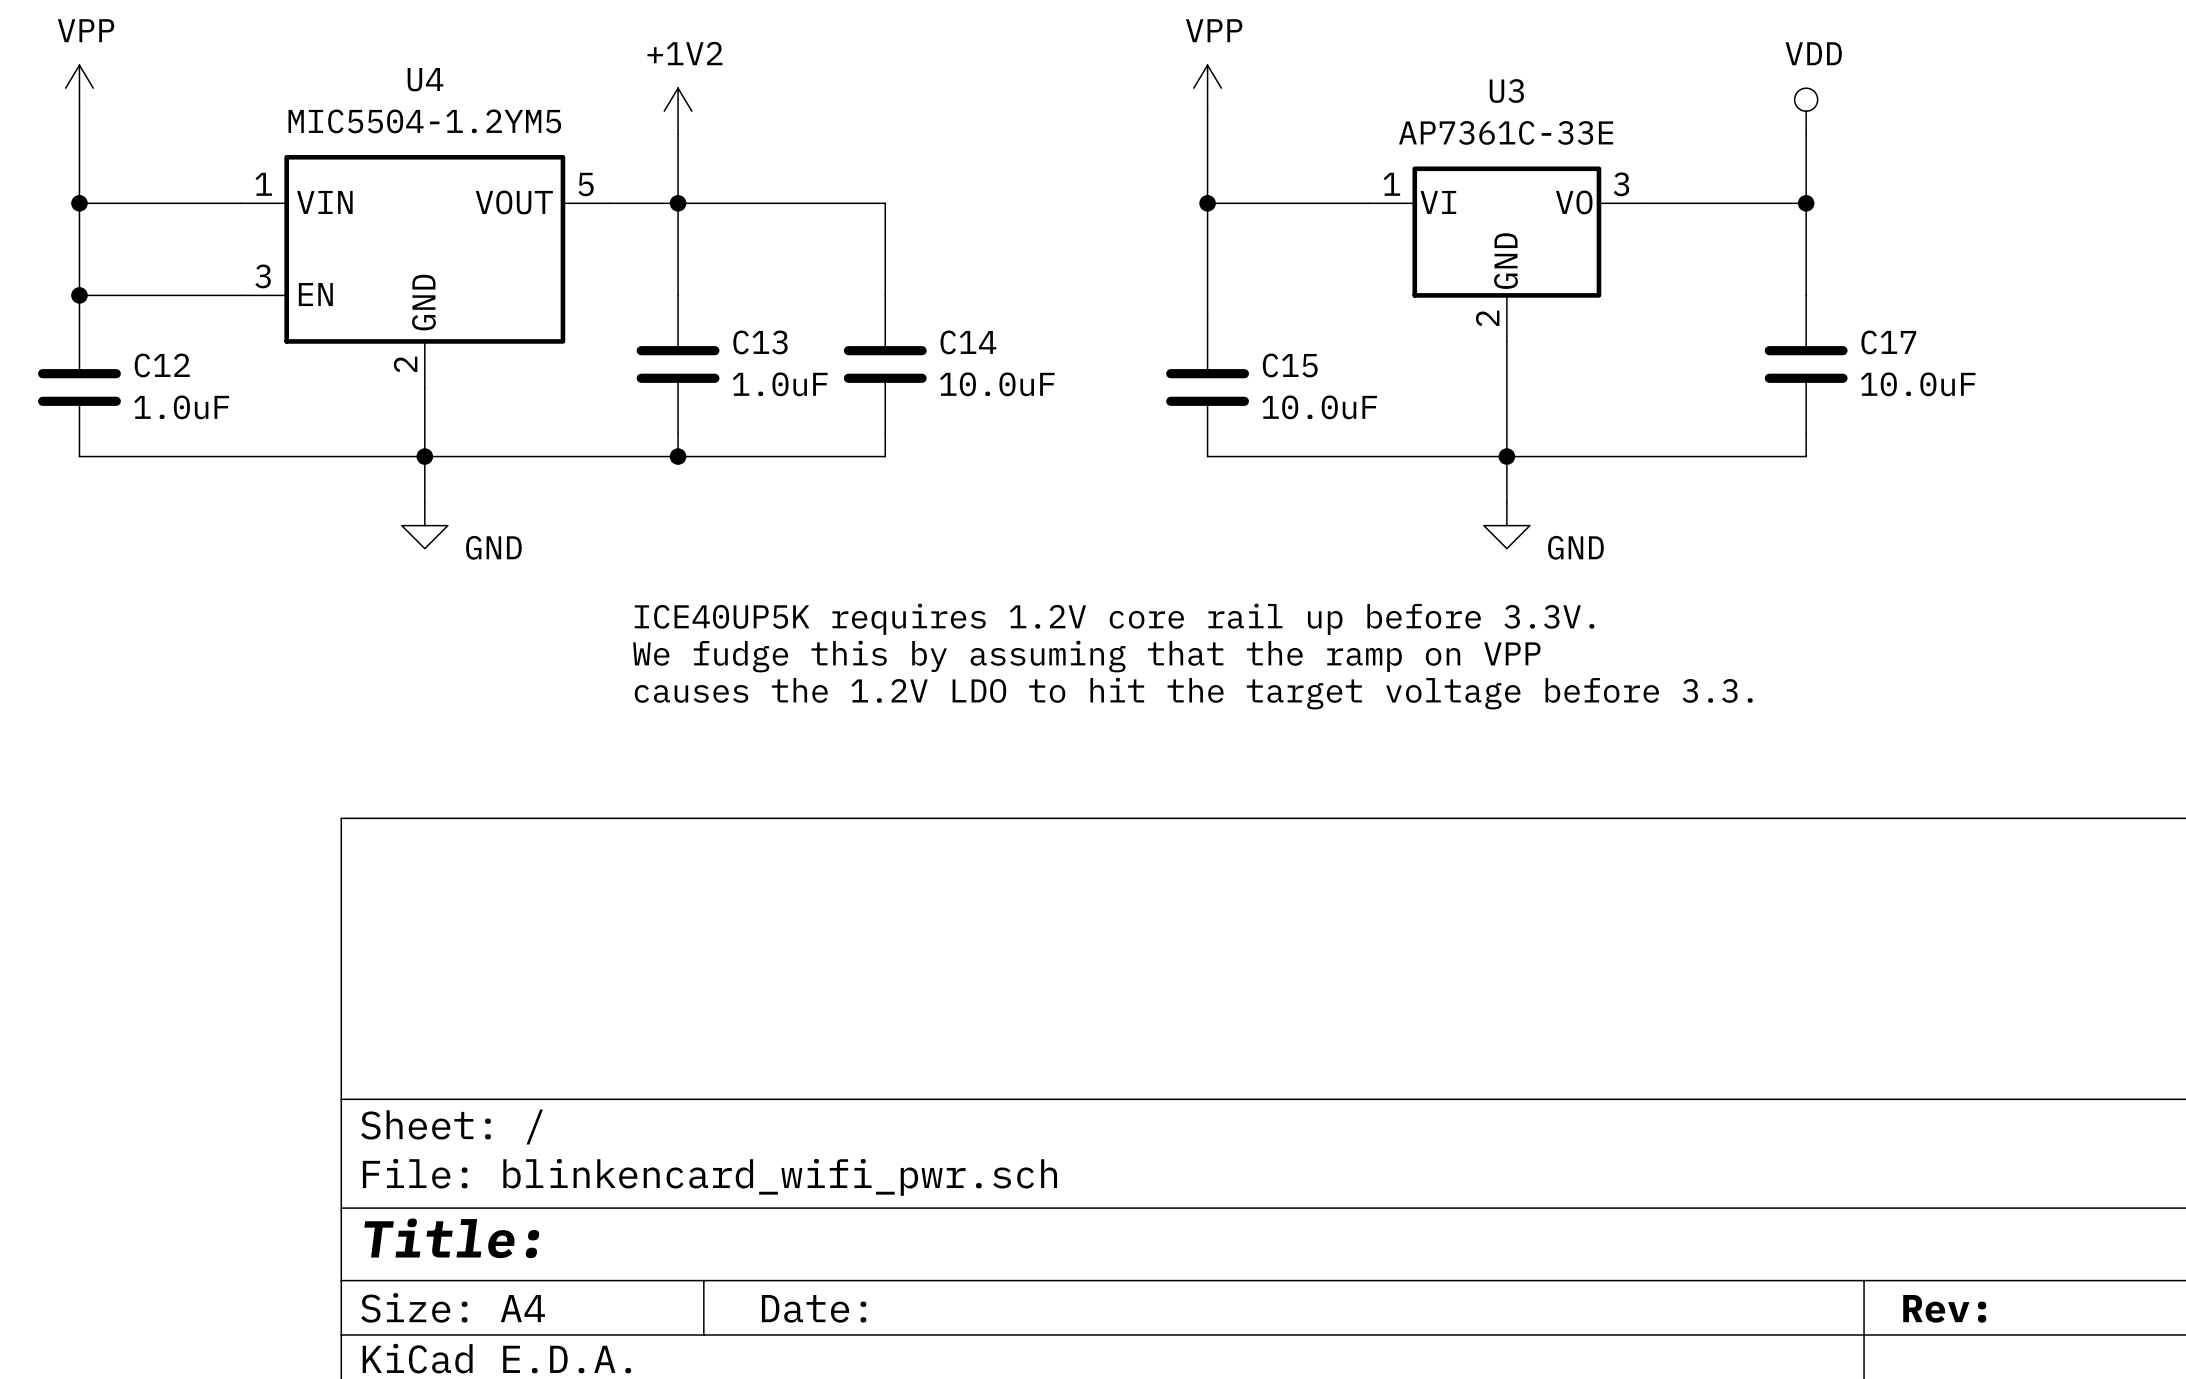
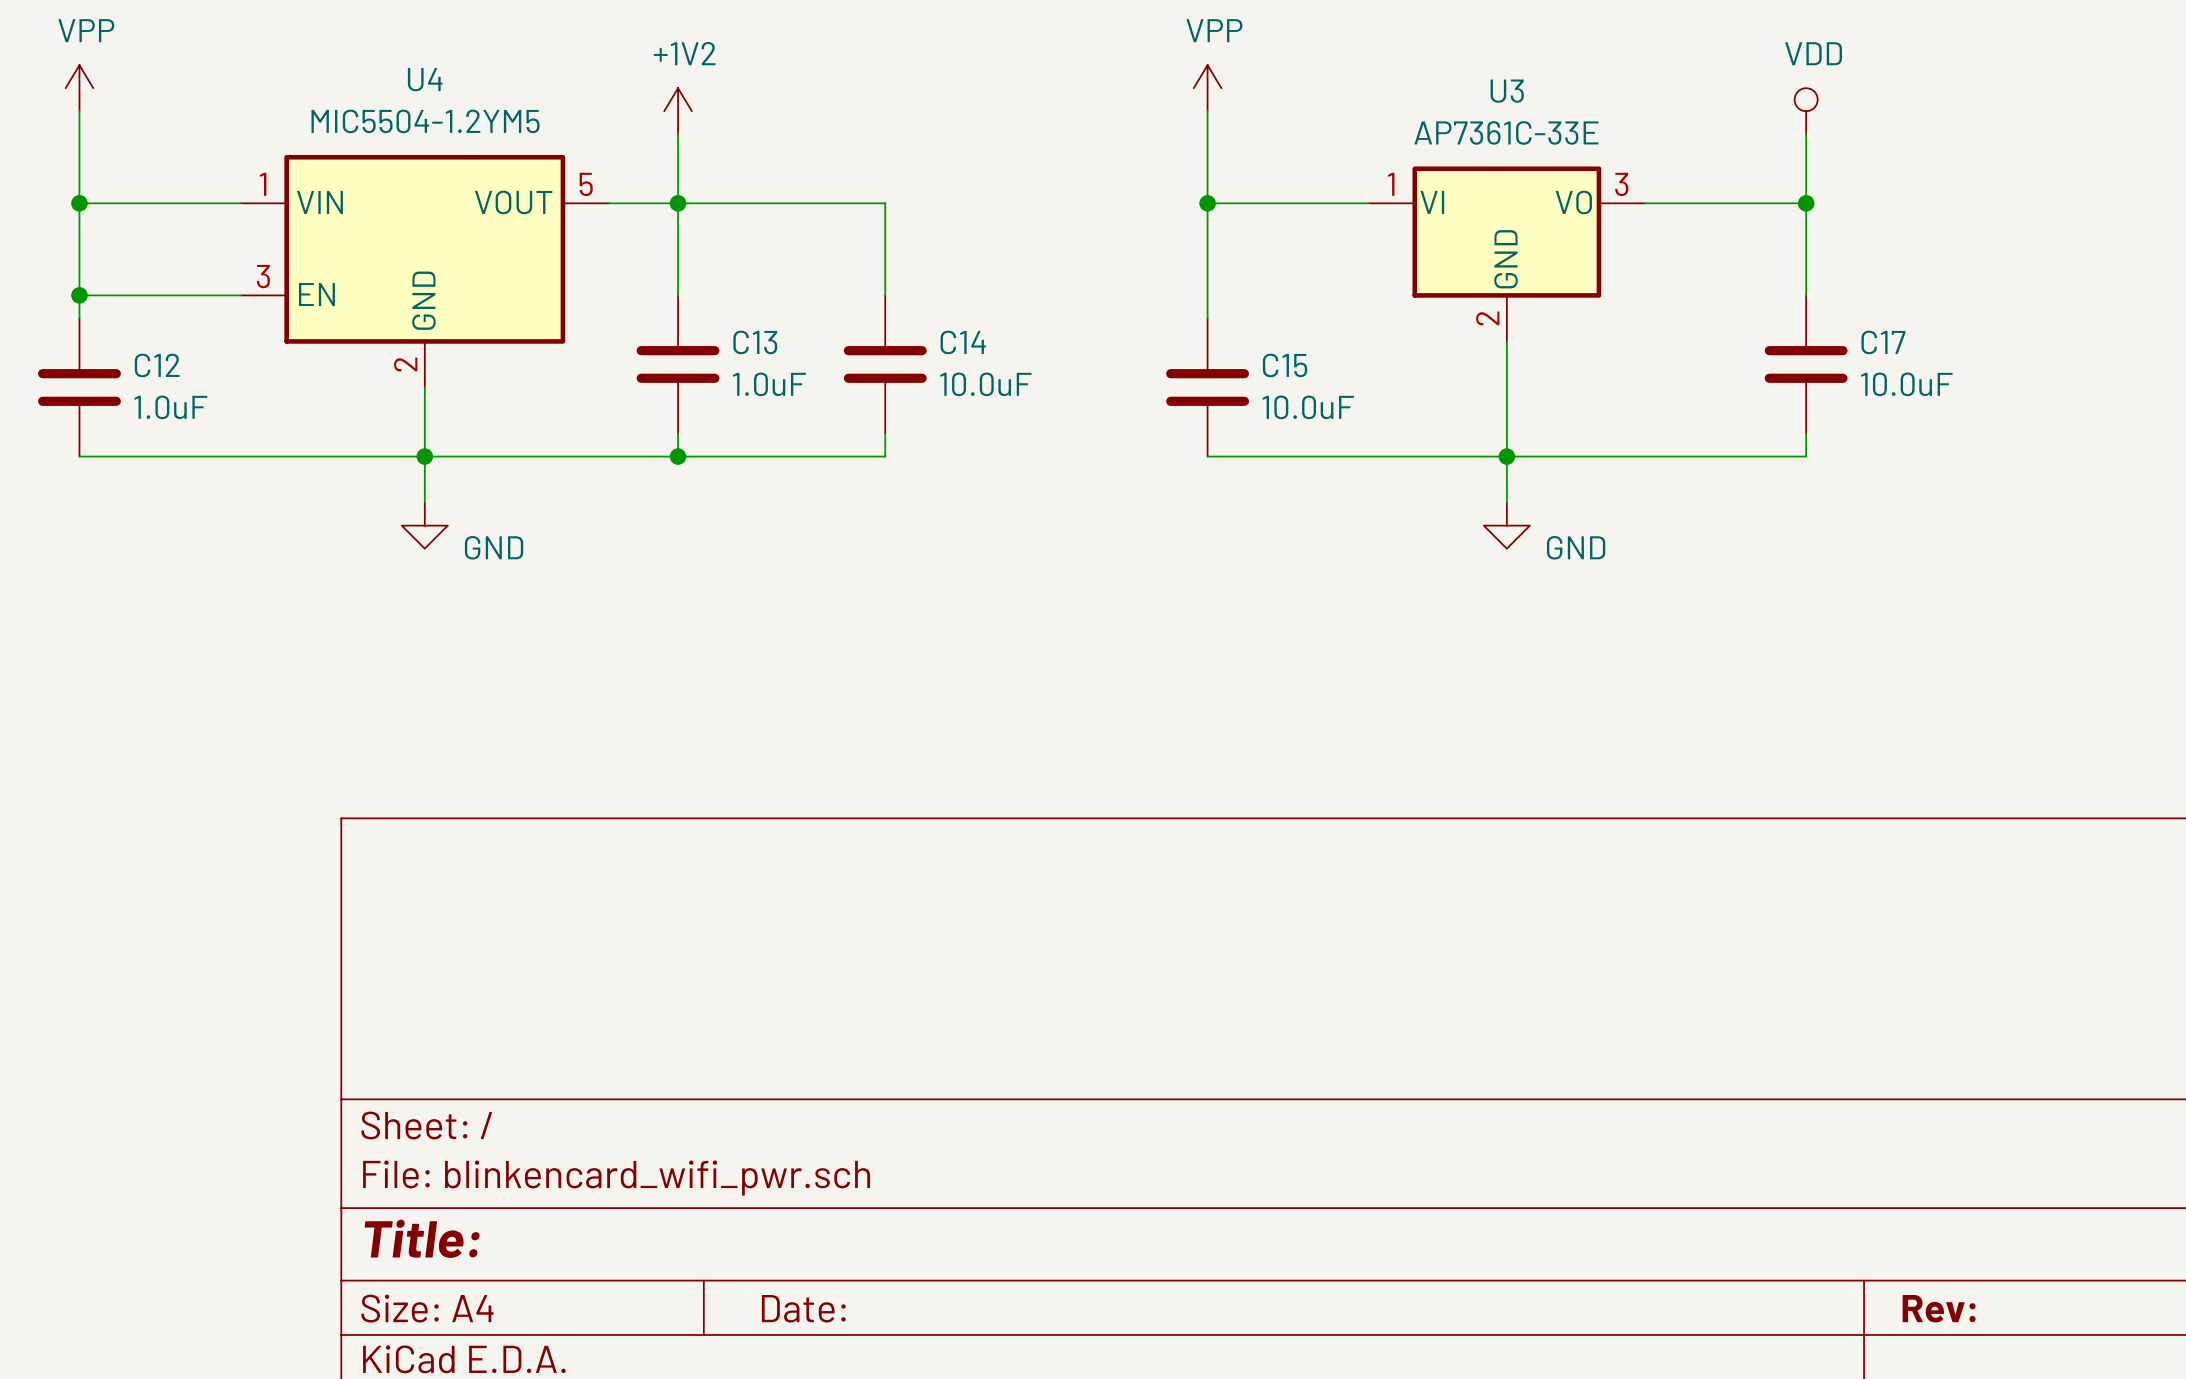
text: ICE40UP5K requires 1.2V core rail up before 3.3V. (1114, 619) -> none
text: We fudge this by assuming that the ramp on VPP (1086, 656) -> none
text: causes the 1.2V LDO to hit the target voltage before 3.3. (1193, 693) -> none

